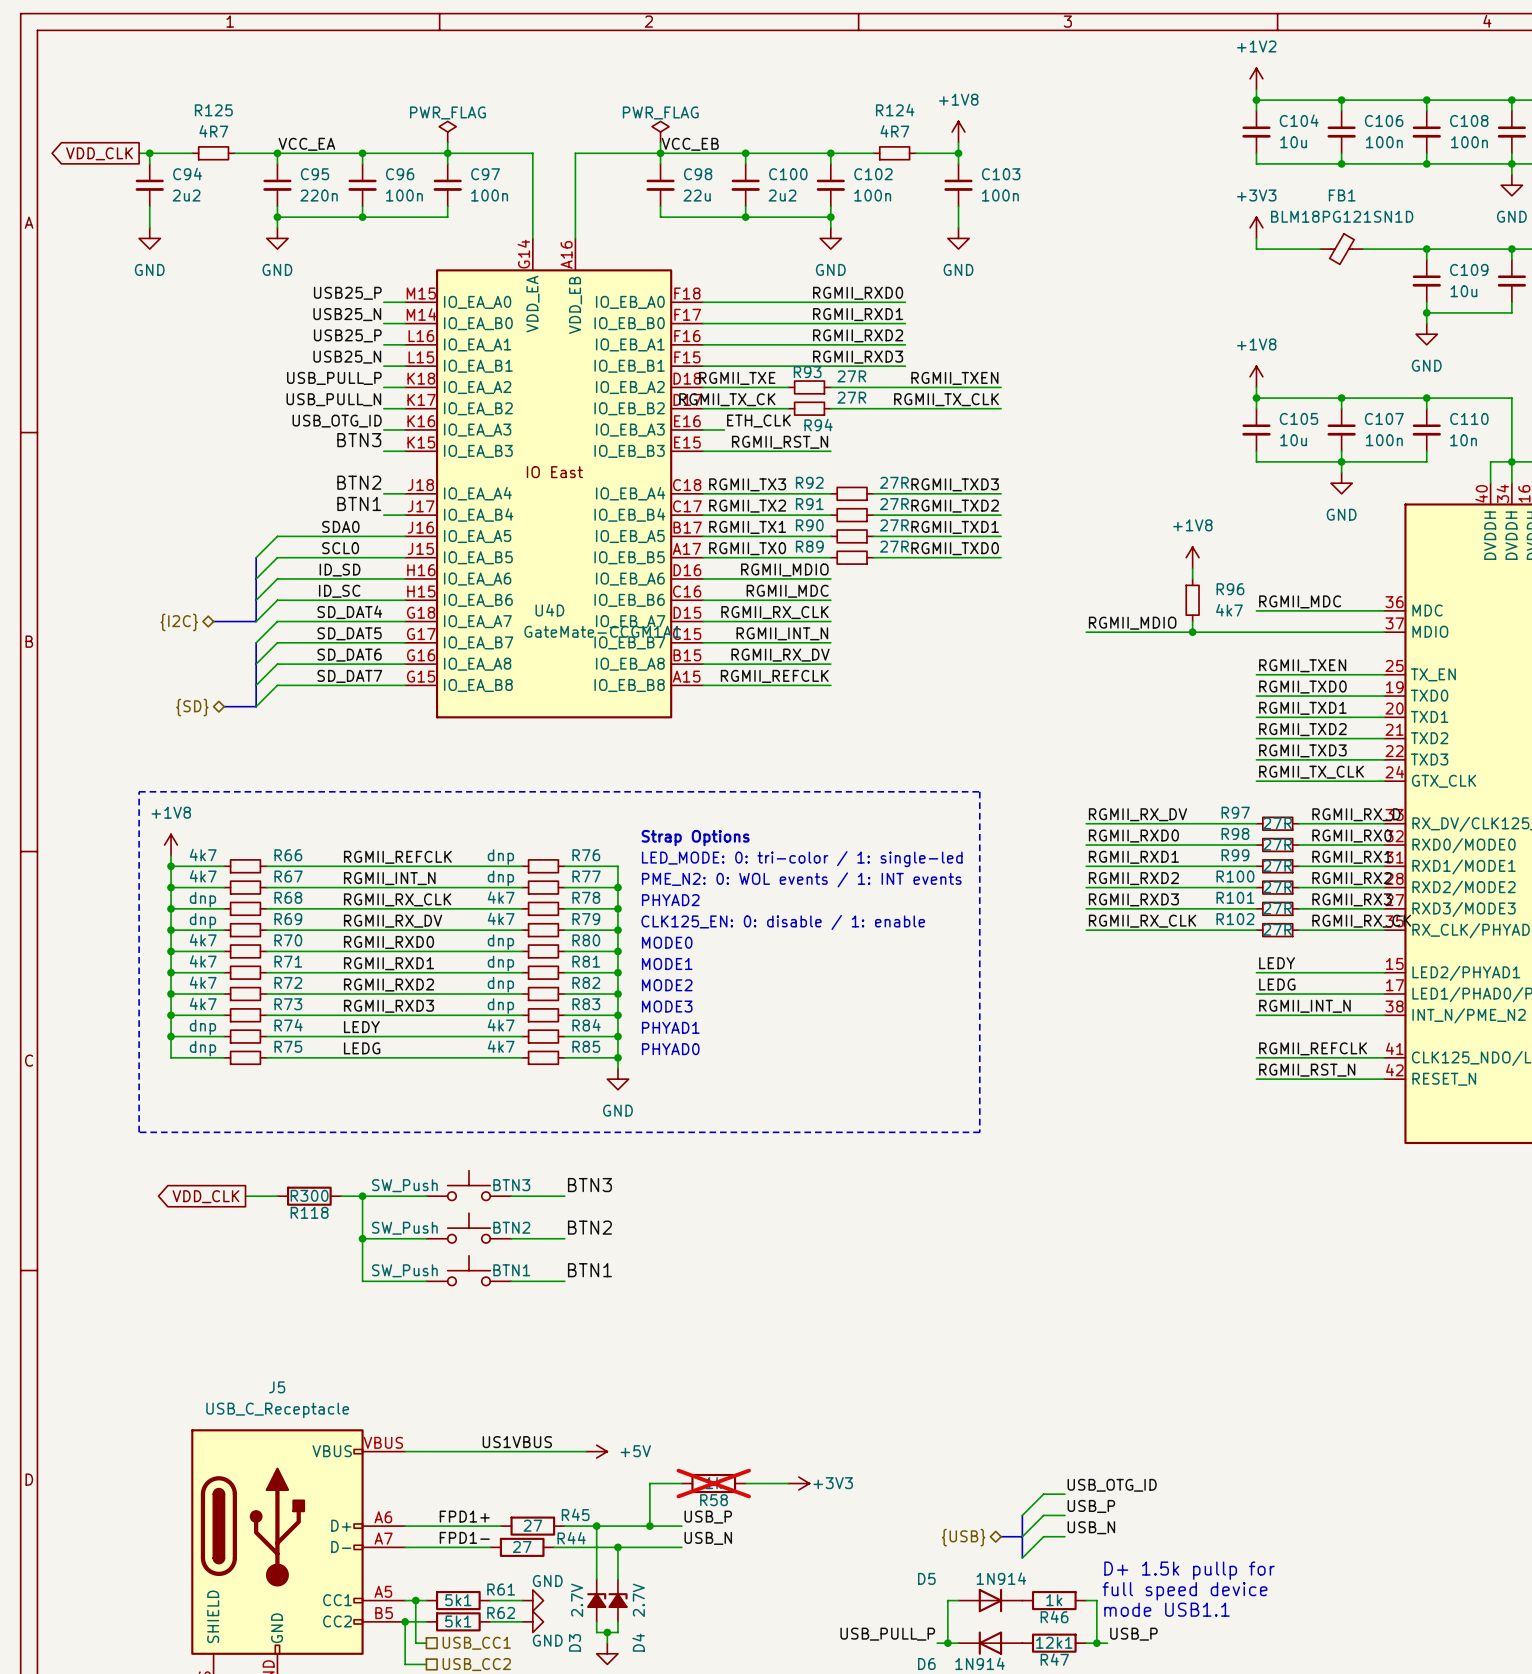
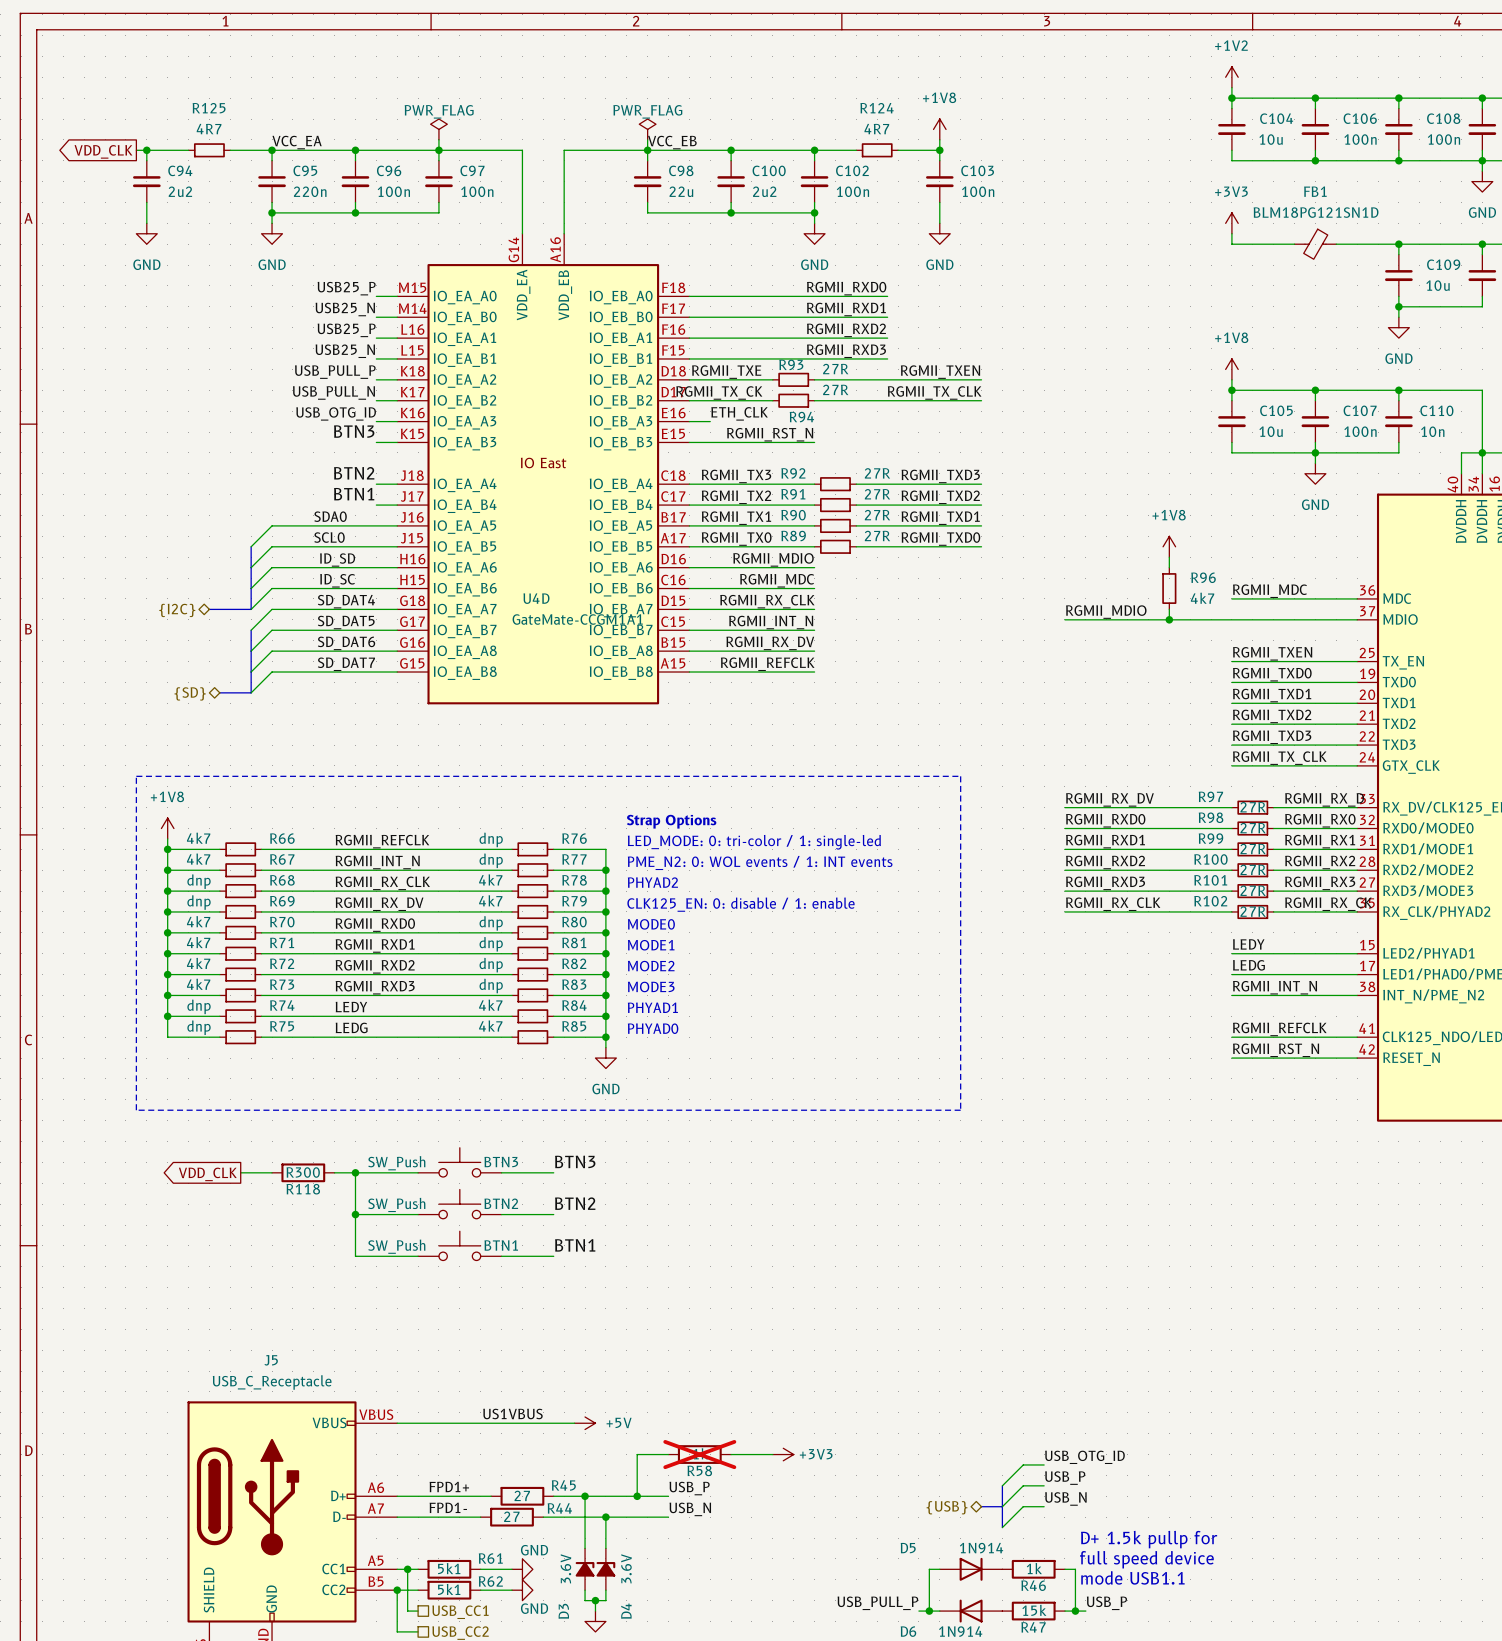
D3 value: 2.7V (577, 1600) -> 3.6V (565, 1568)
D4 value: 2.7V (638, 1600) -> 3.6V (626, 1568)
R47 value: 12k1 (1054, 1642) -> 15k (1034, 1610)

